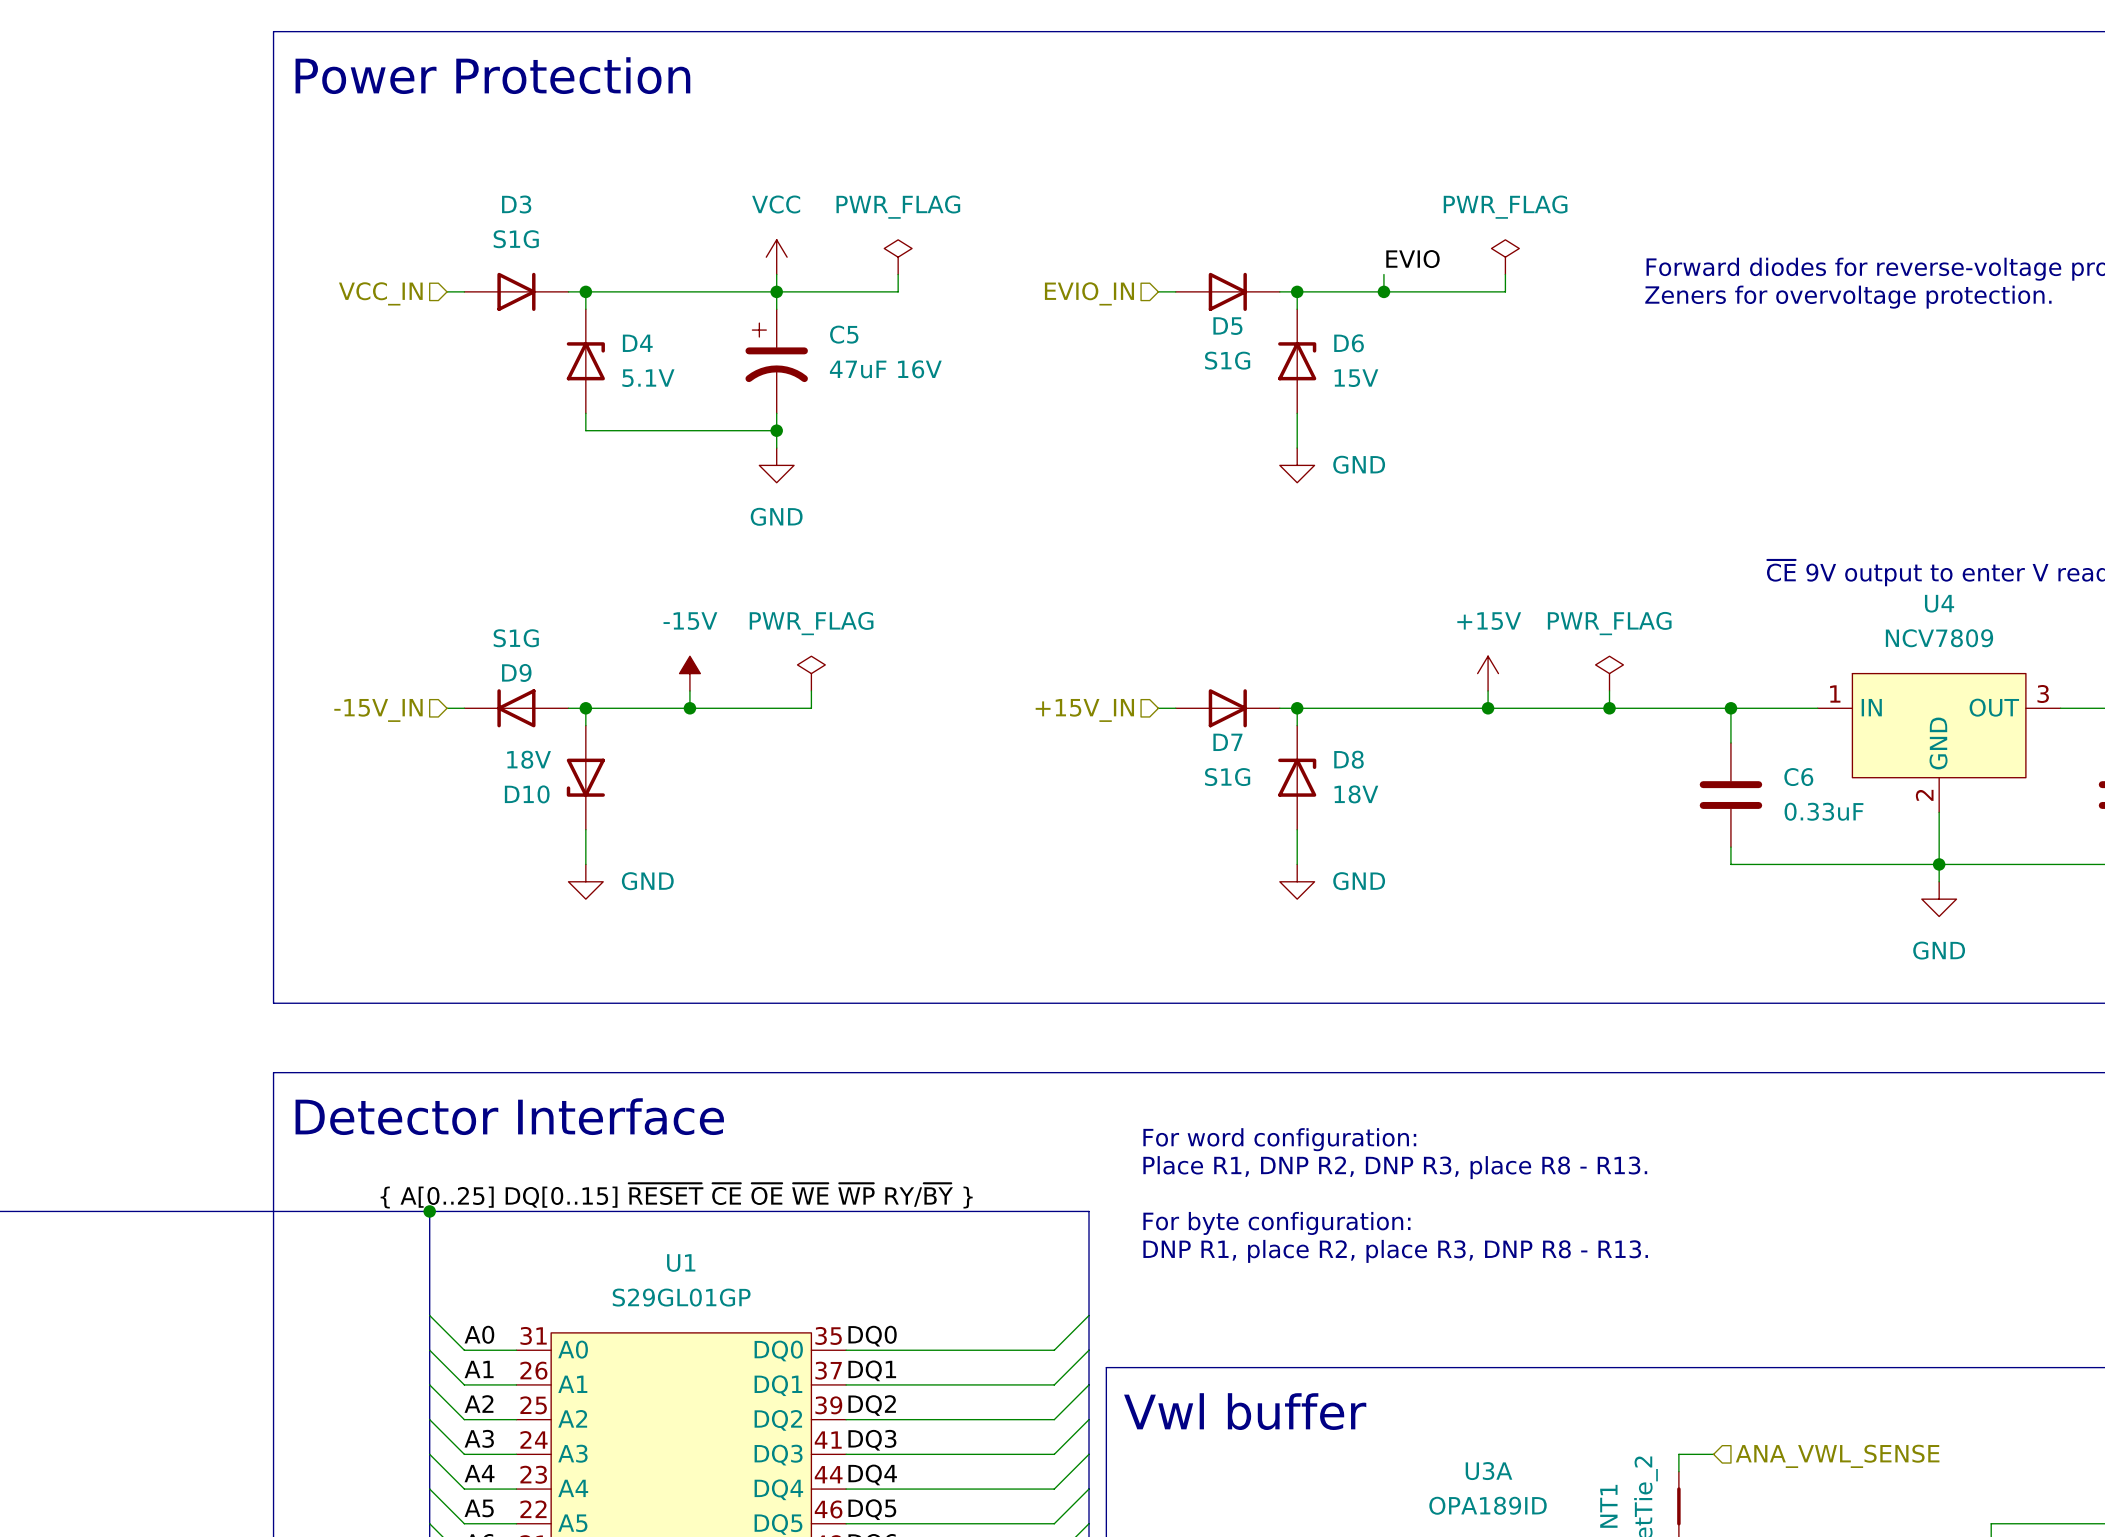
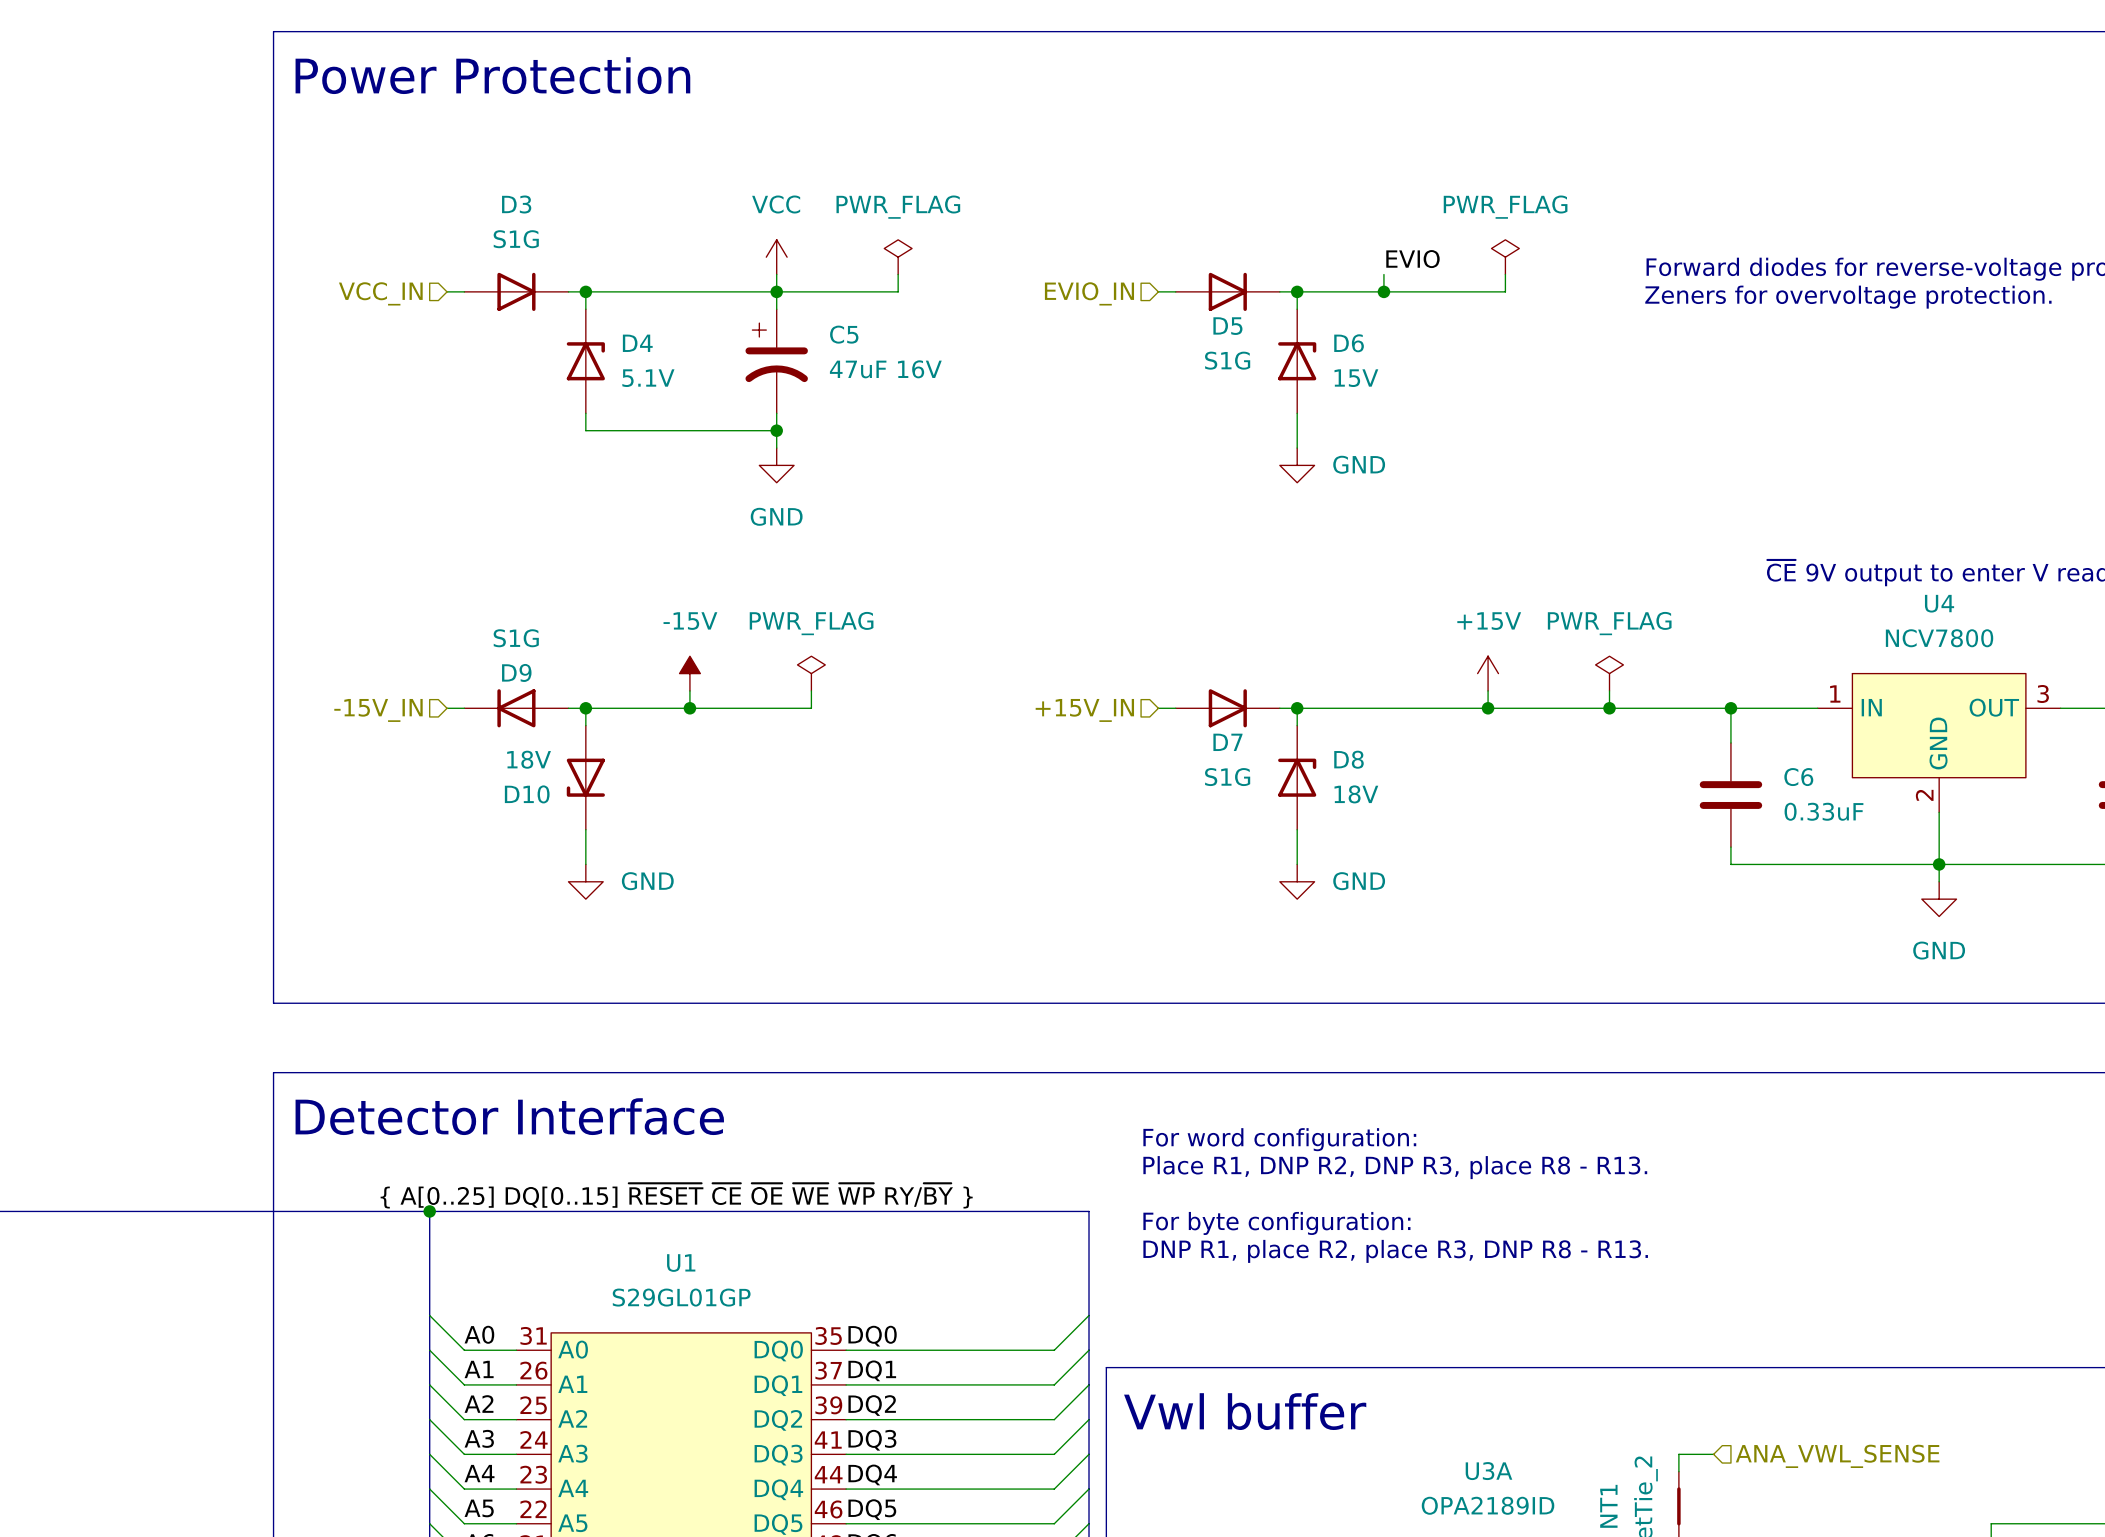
U4 value: NCV7809 (1939, 638) -> NCV7800 (1939, 638)
U3A value: OPA189ID (1488, 1505) -> OPA2189ID (1488, 1505)

